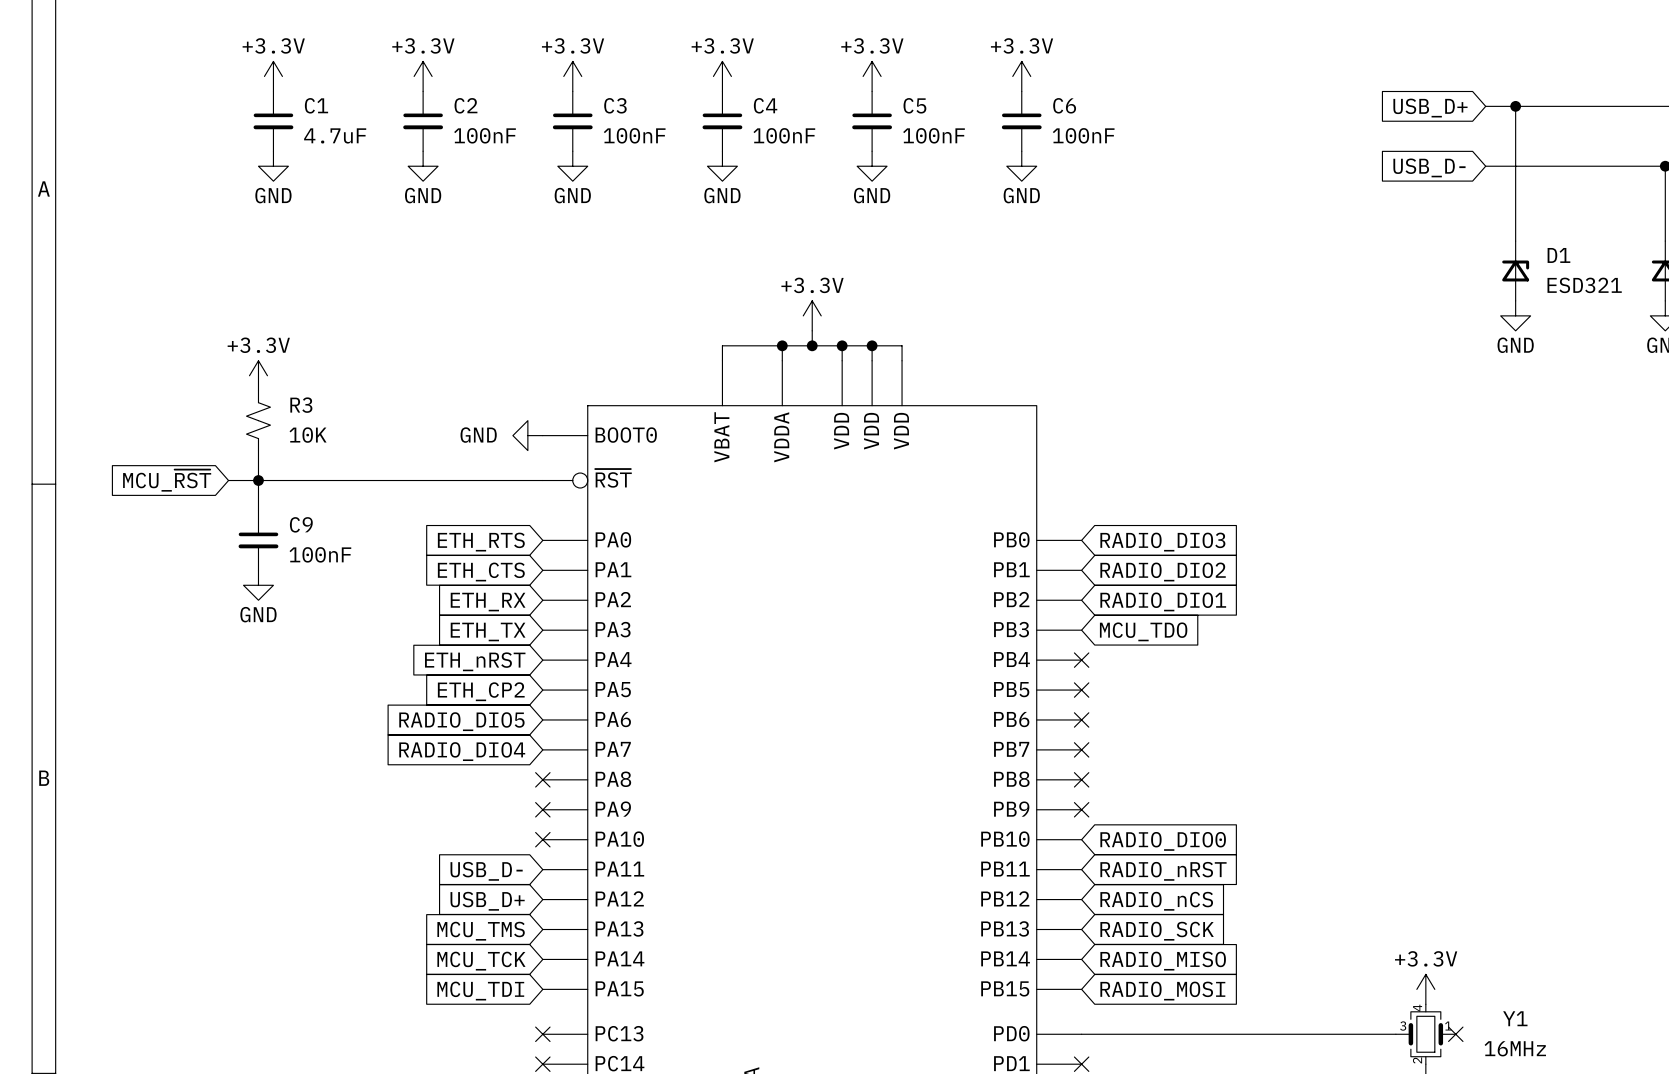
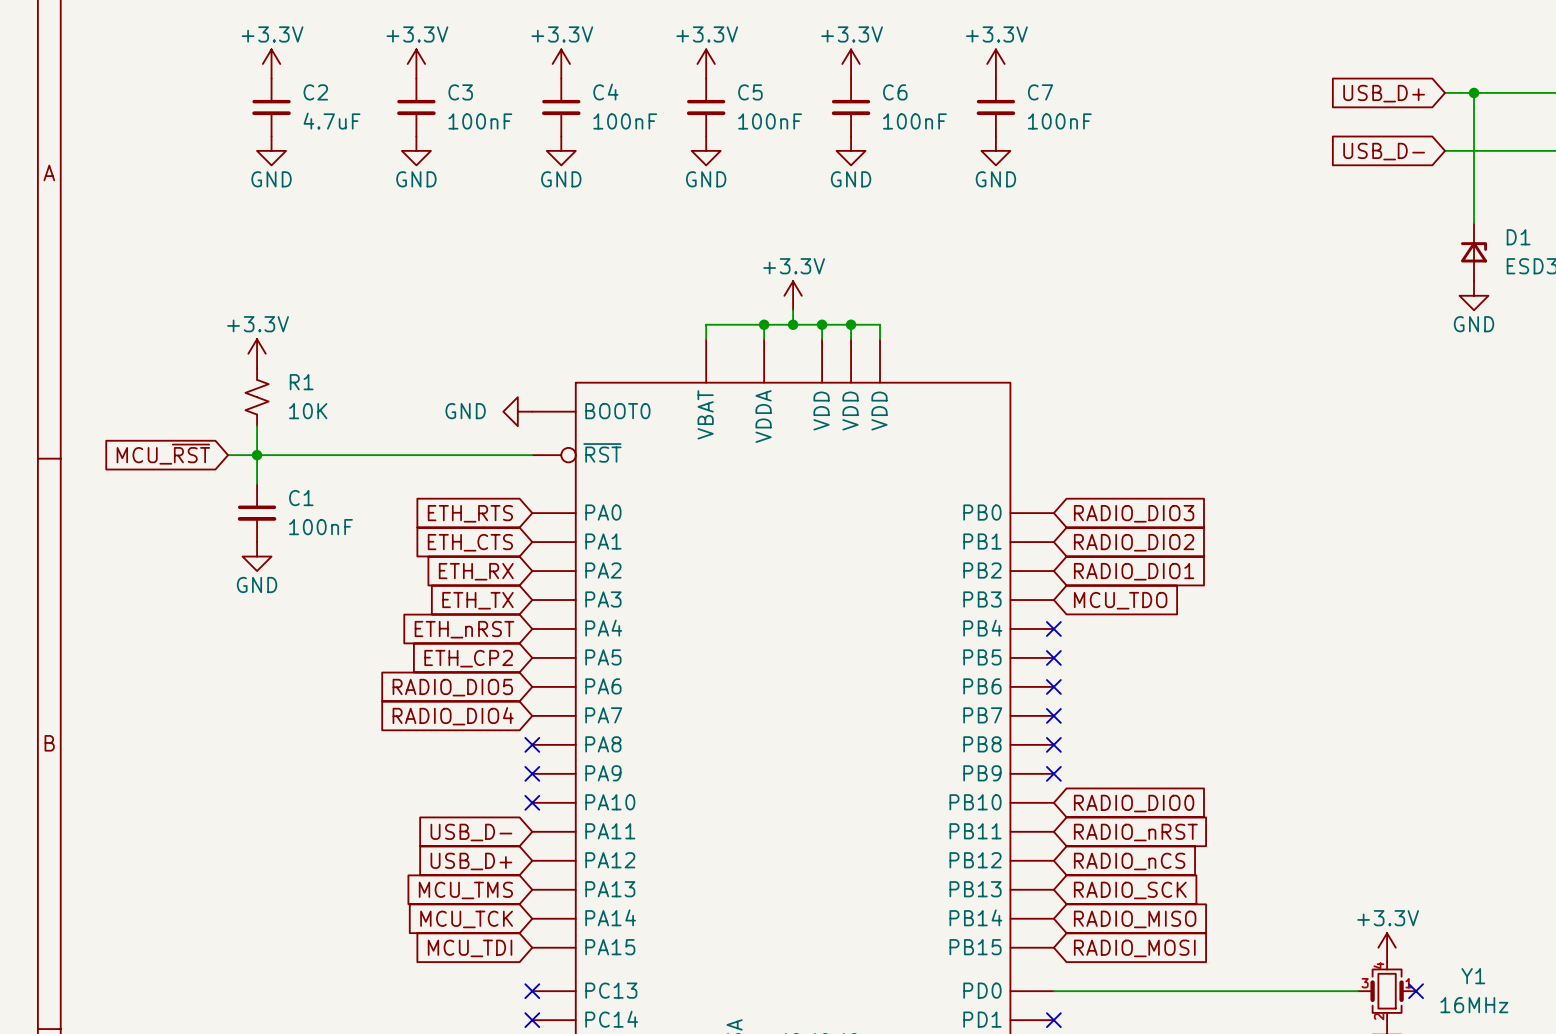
C1 name: C1 (316, 105) -> C2 (315, 92)
C2 name: C2 (465, 105) -> C3 (460, 92)
C3 name: C3 (615, 105) -> C4 (605, 92)
C4 name: C4 (765, 105) -> C5 (750, 92)
C5 name: C5 (914, 105) -> C6 (895, 92)
C6 name: C6 (1064, 105) -> C7 (1040, 92)
R3 name: R3 (301, 405) -> R1 (301, 382)
C9 name: C9 (301, 524) -> C1 (301, 498)

